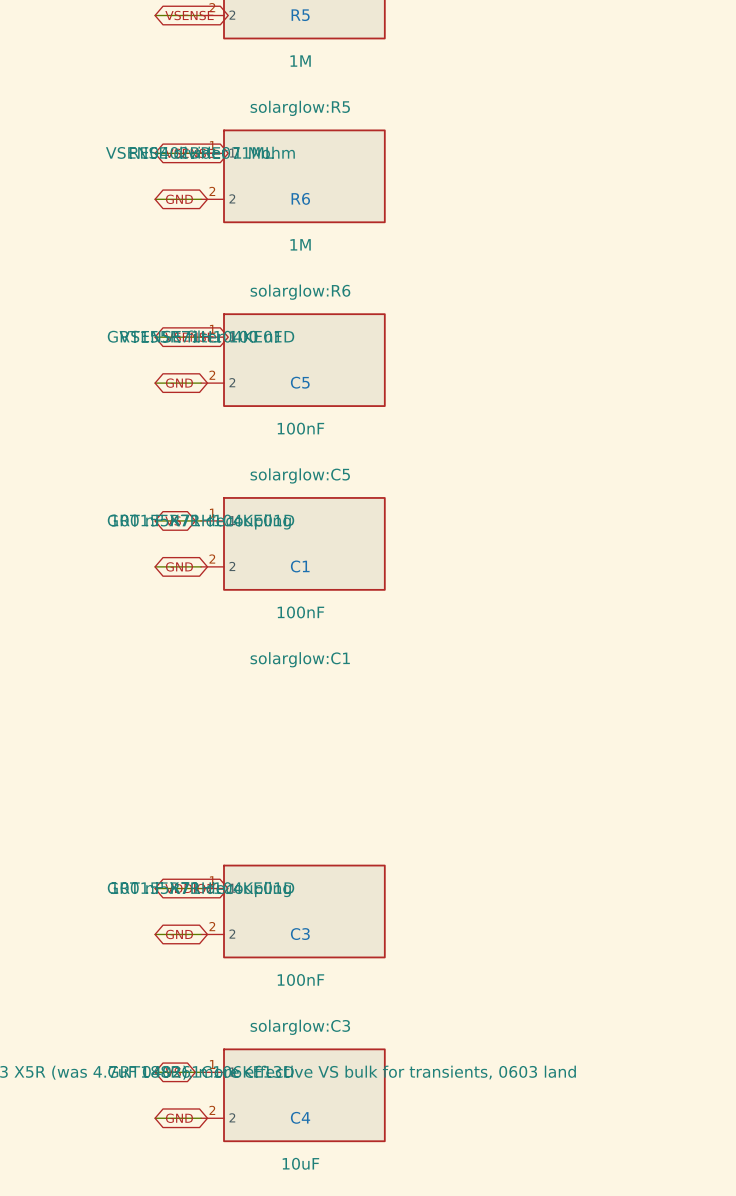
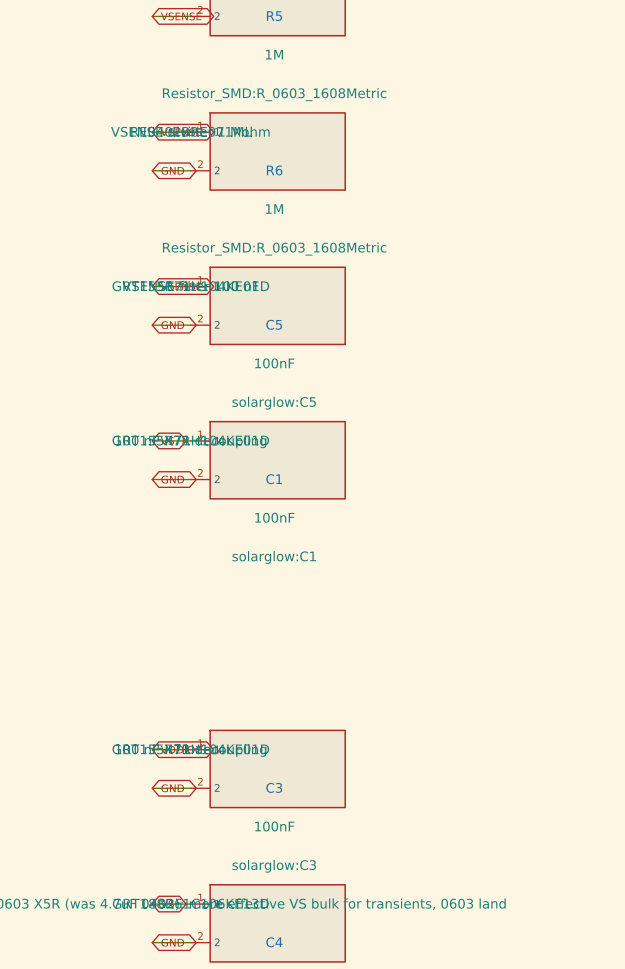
R5 text: solarglow:R5 (300, 108) -> Resistor_SMD:R_0603_1608Metric (274, 94)
R6 text: solarglow:R6 (300, 292) -> Resistor_SMD:R_0603_1608Metric (274, 248)

